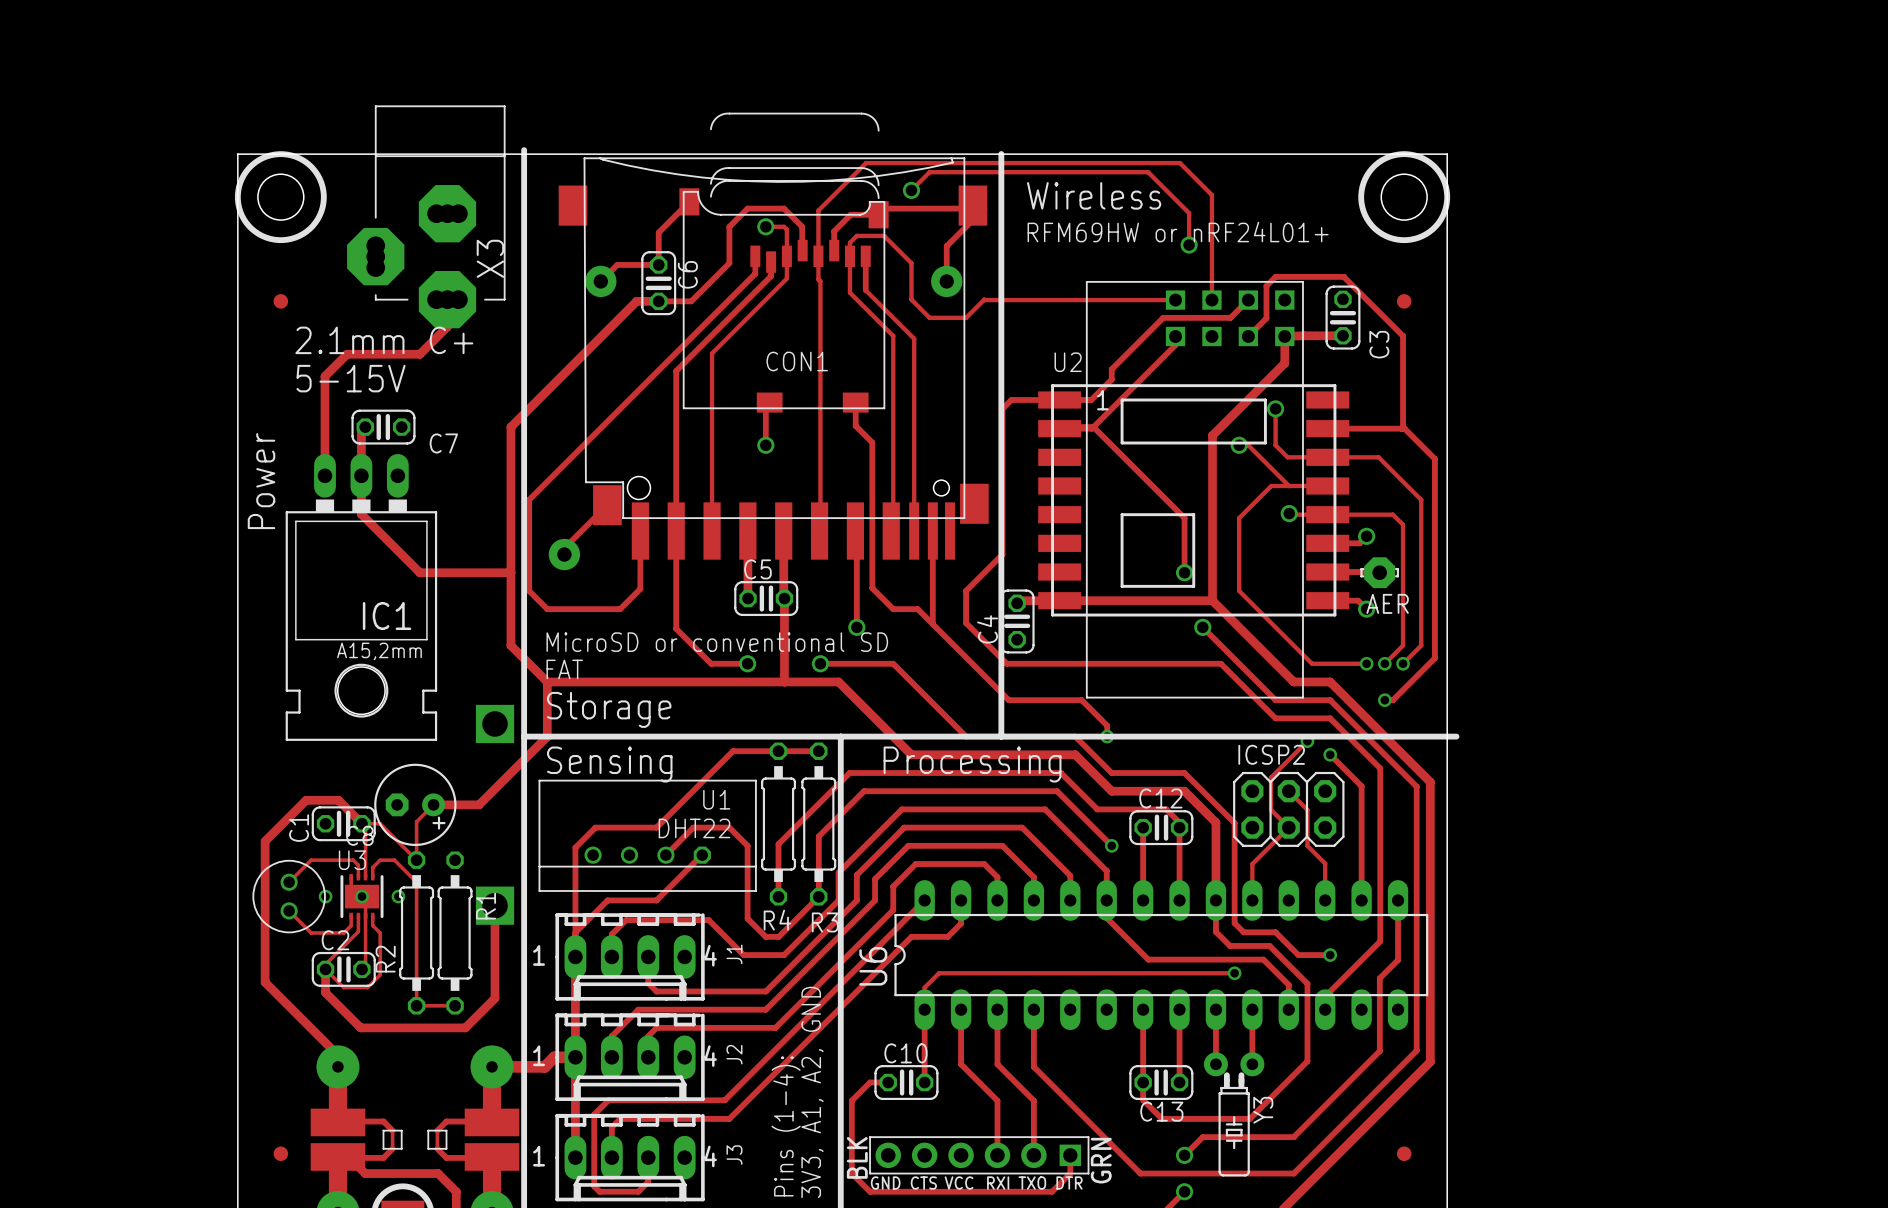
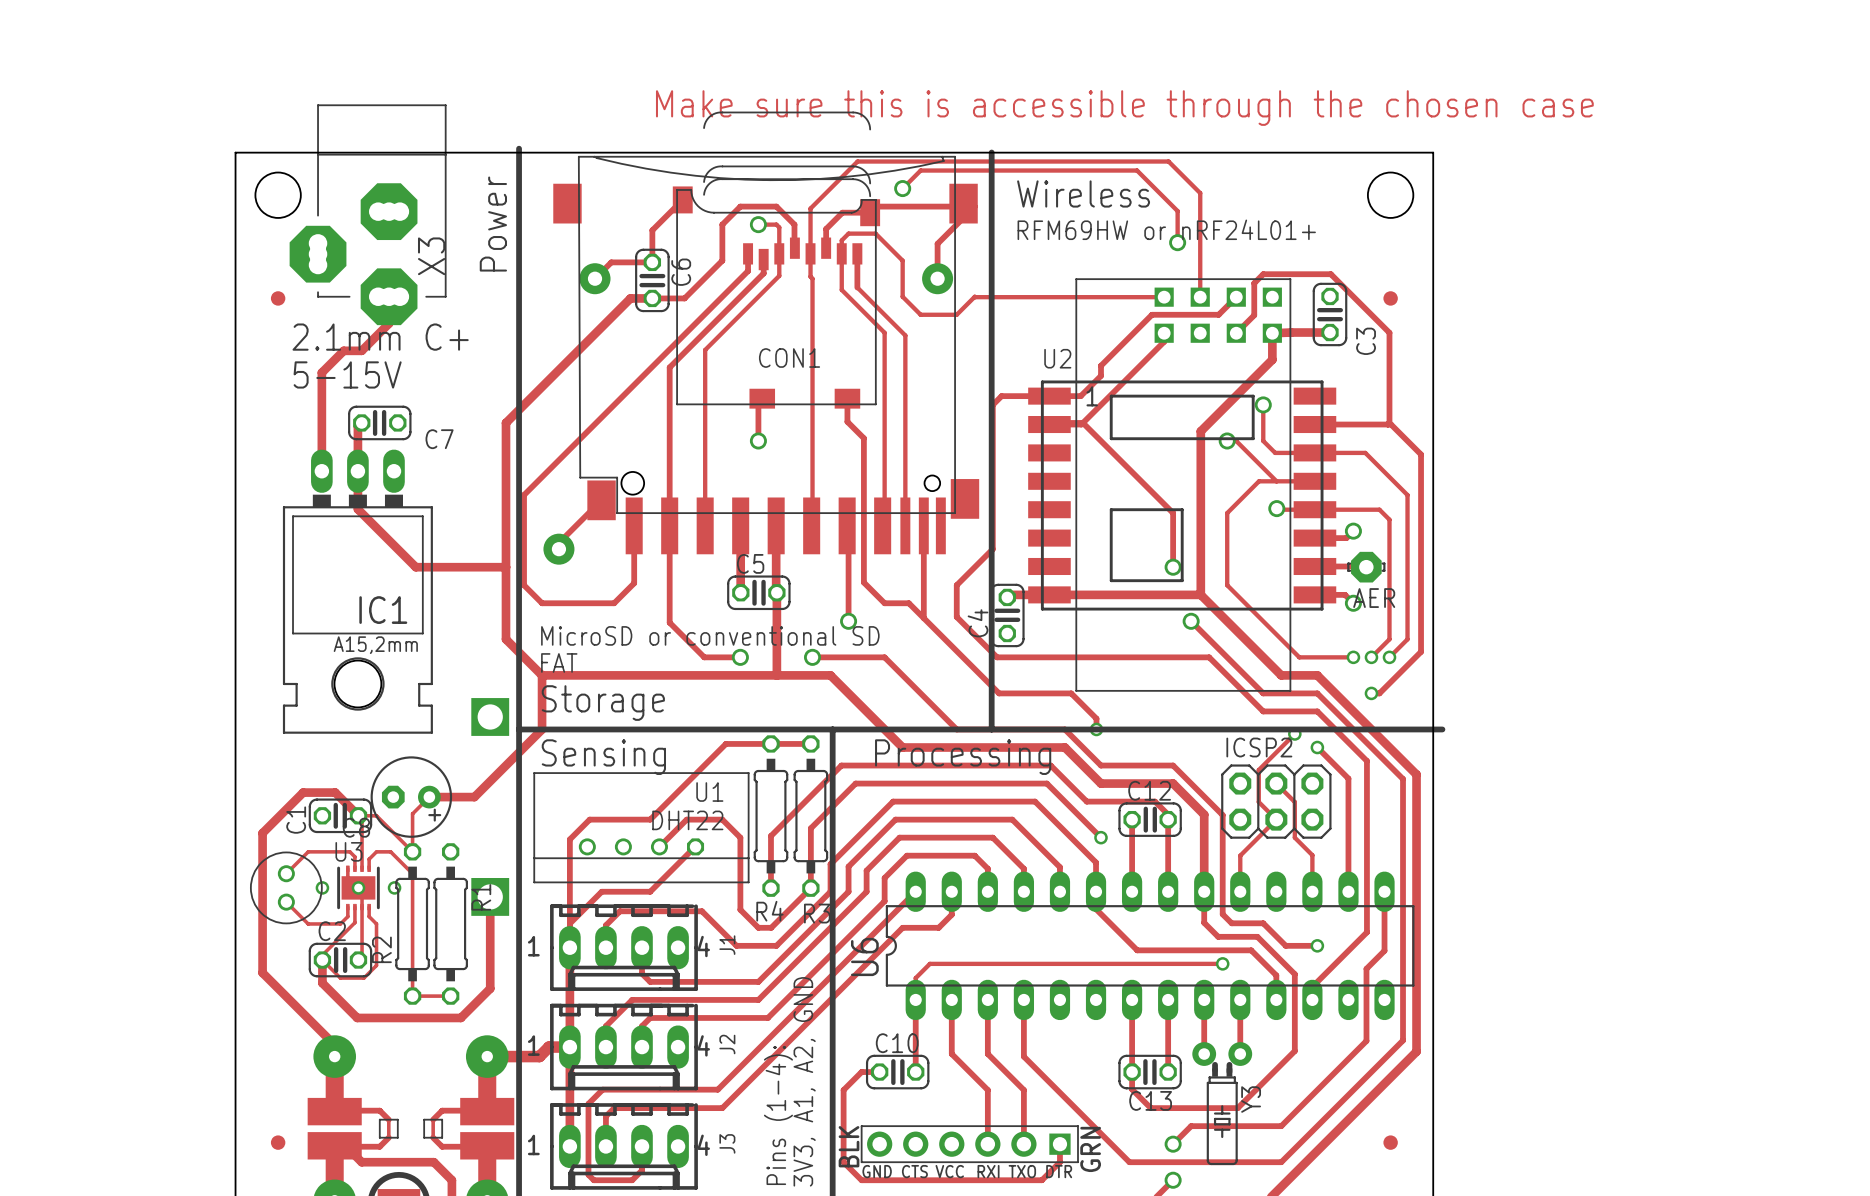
text: none -> Make sure this is accessible through the chosen case (1124, 108)
drawing: [234, 151, 327, 244] -> none
drawing: [1358, 151, 1451, 244] -> none
X3 position: (426, 216) -> (368, 214)
track: (447, 299) (447, 326) (419, 354) (365, 354) -> (389, 296) (389, 323) (361, 350)
text position: Power (261, 481) -> Power (493, 224)

